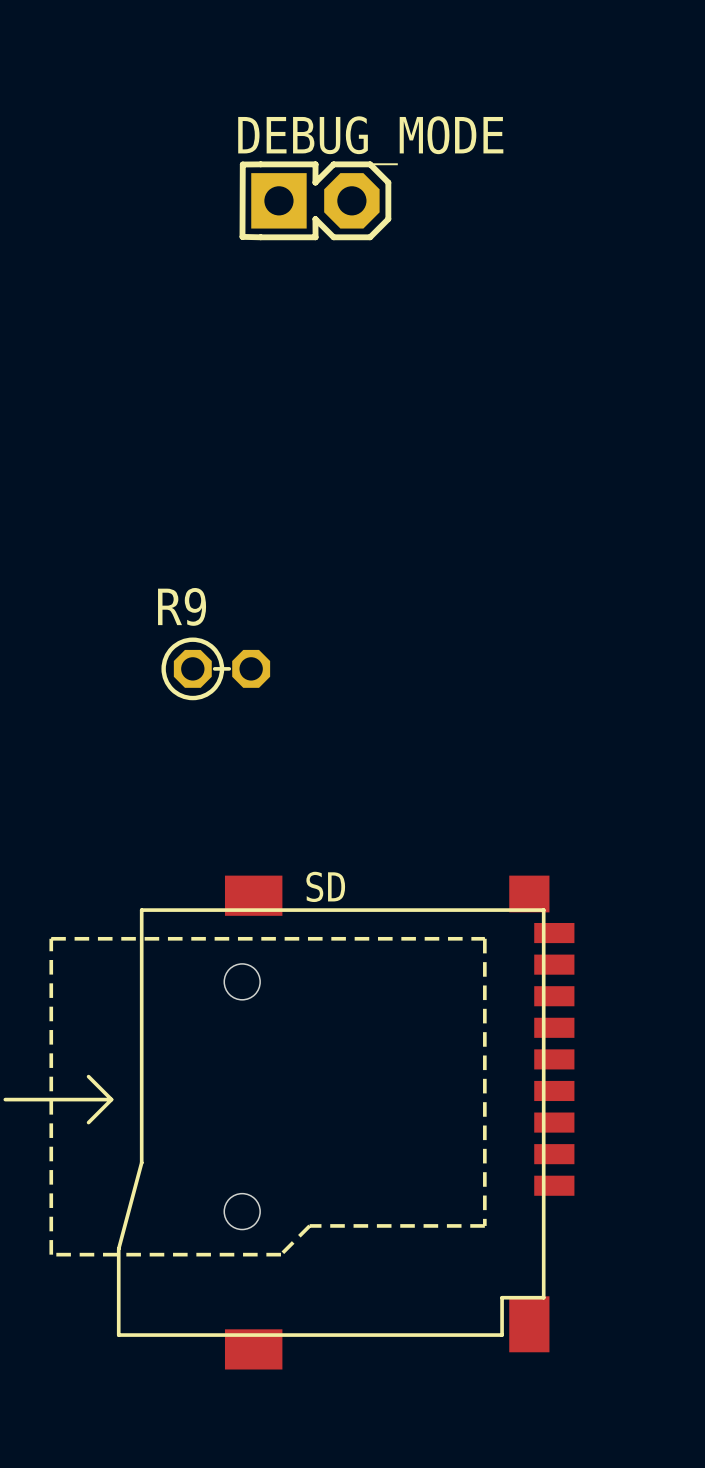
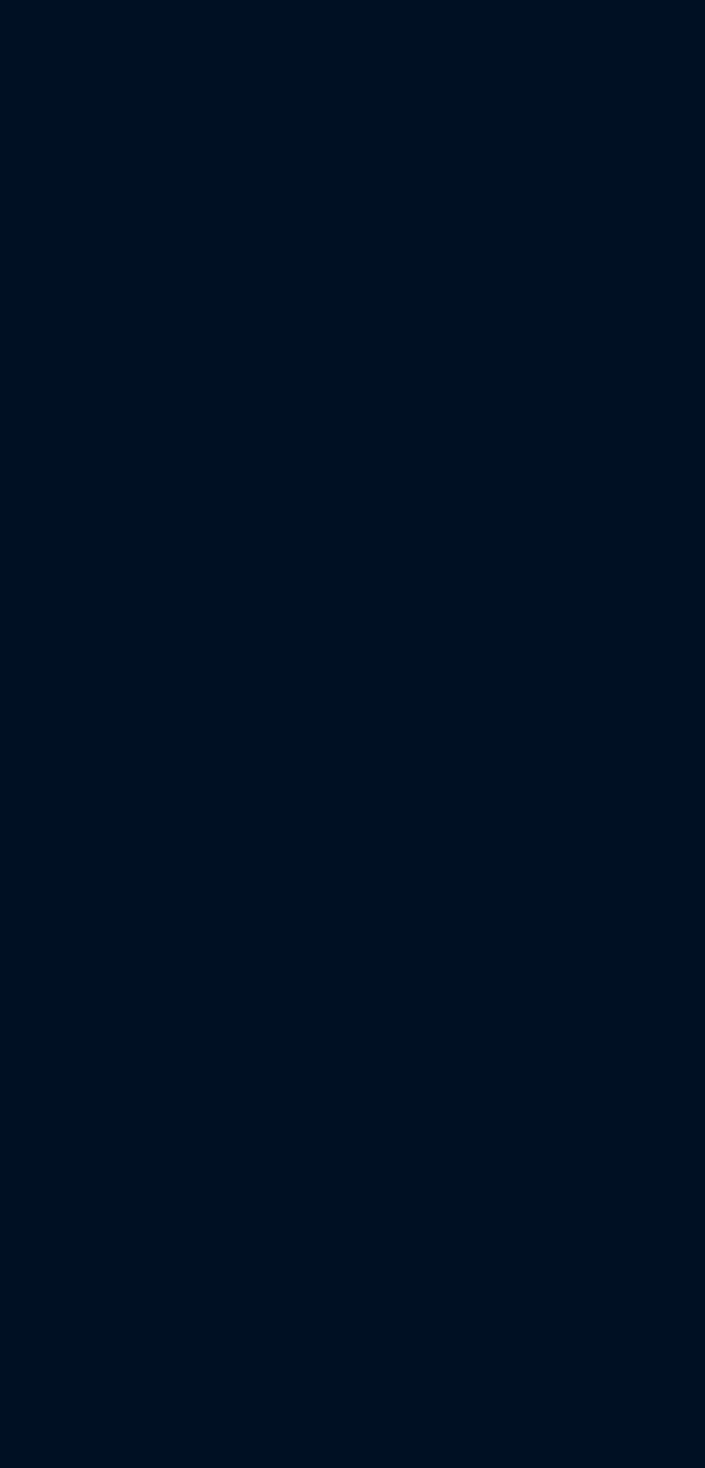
DEBUG_MODE: (315, 200) -> none
R9: (215, 668) -> none
SD: (288, 1122) -> none

